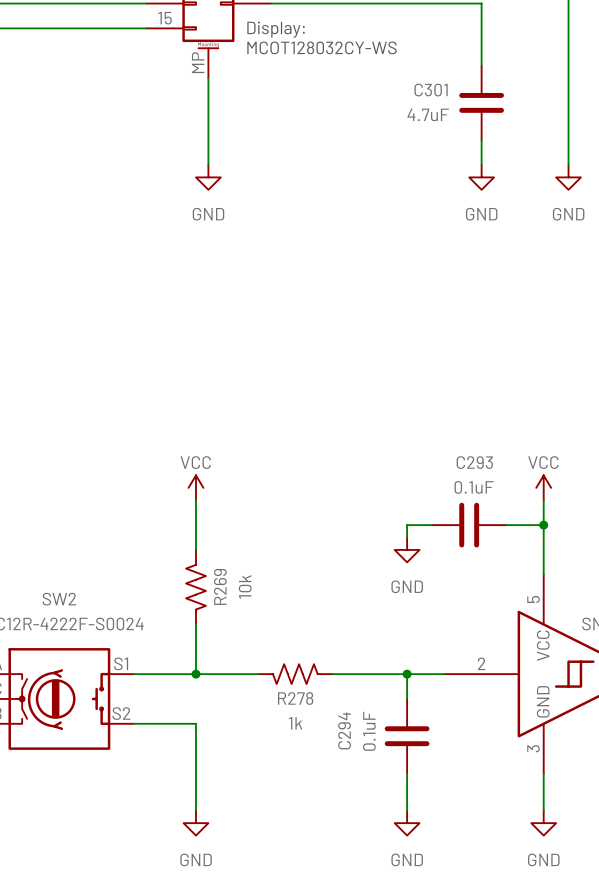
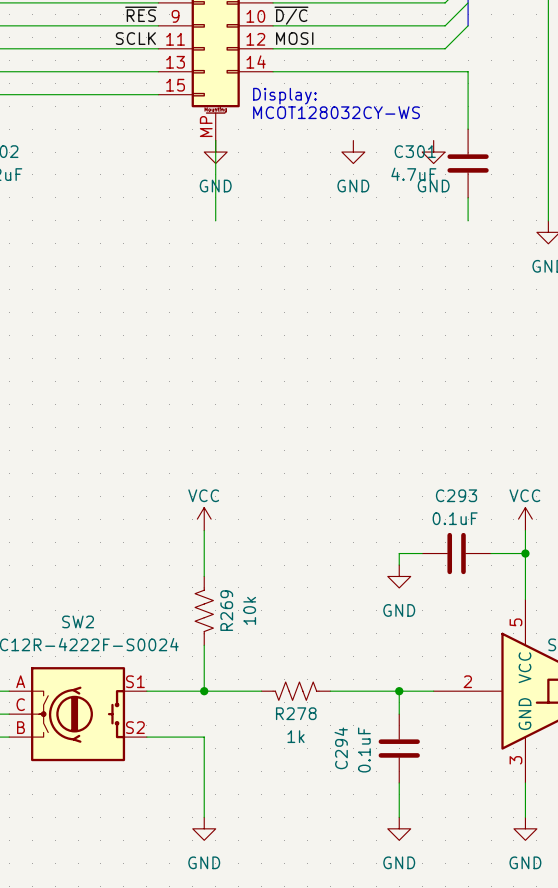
power symbol: none -> GND (215, 152)
power symbol: none -> GND (353, 152)
power symbol: none -> GND (433, 152)
power symbol: GND (208, 177) -> none
power symbol: GND (481, 177) -> none

